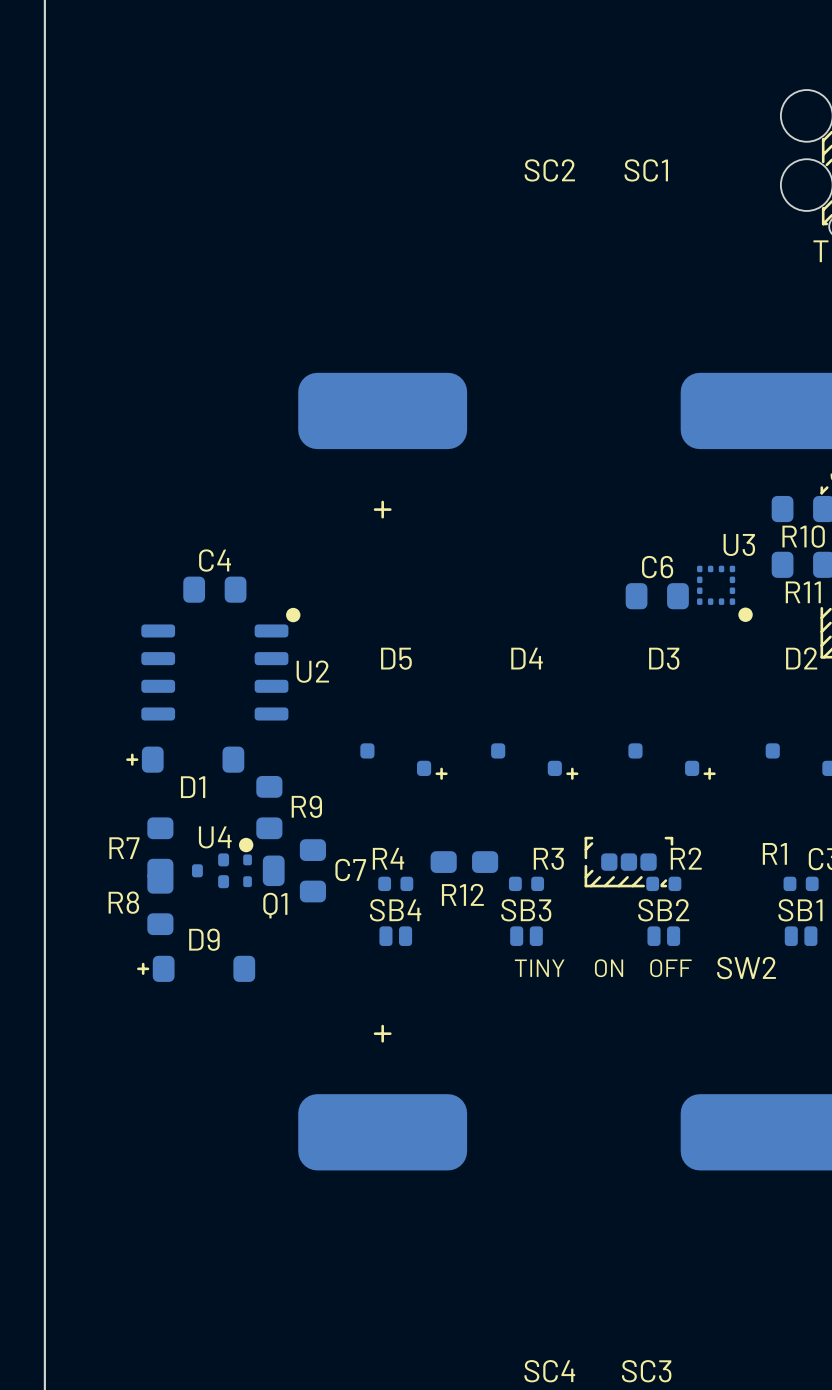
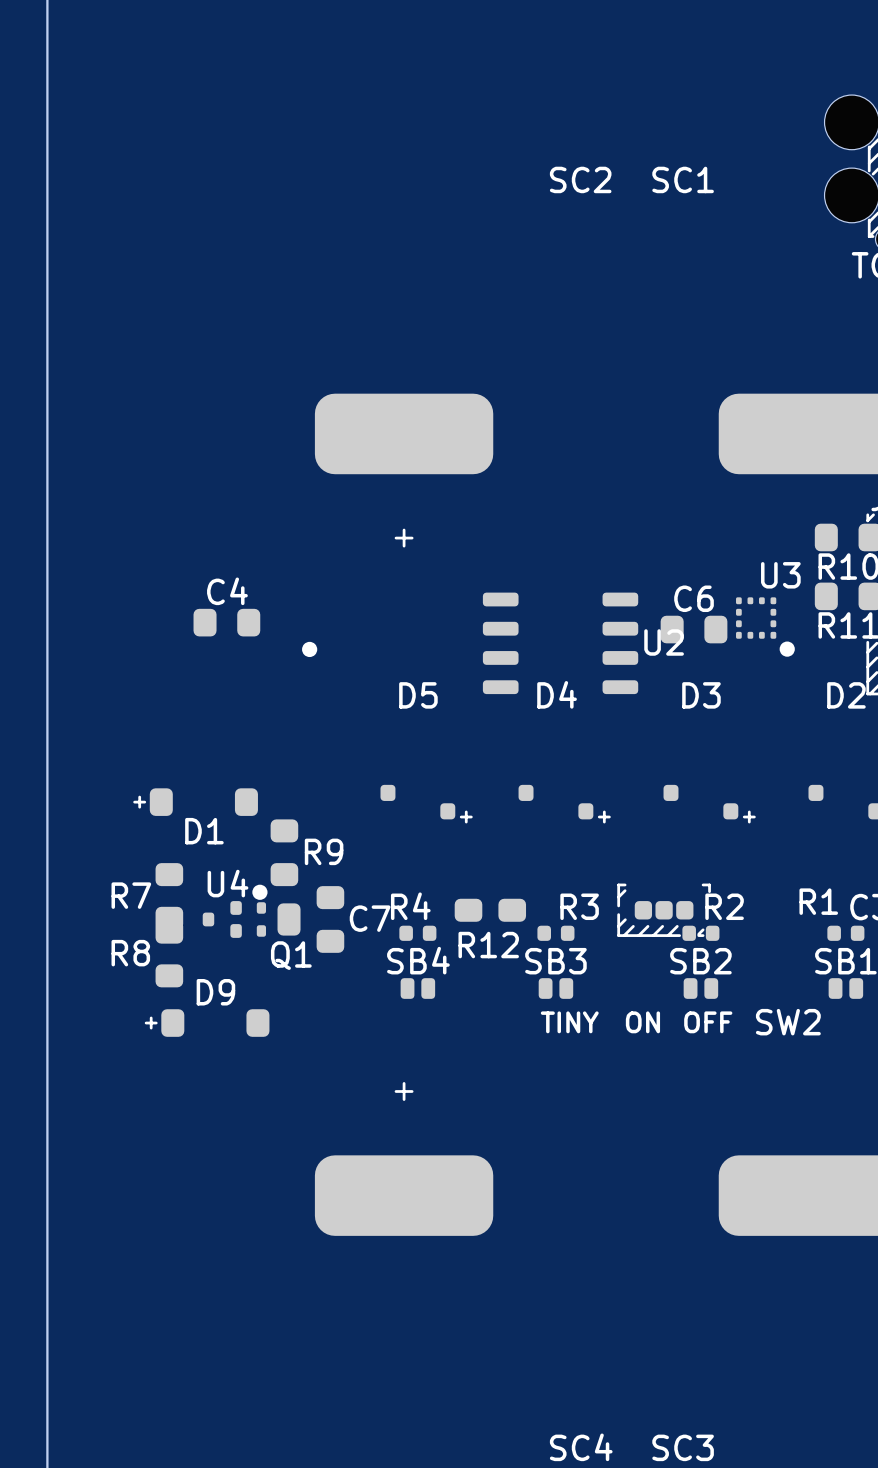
U2 position: (214, 672) -> (560, 643)

